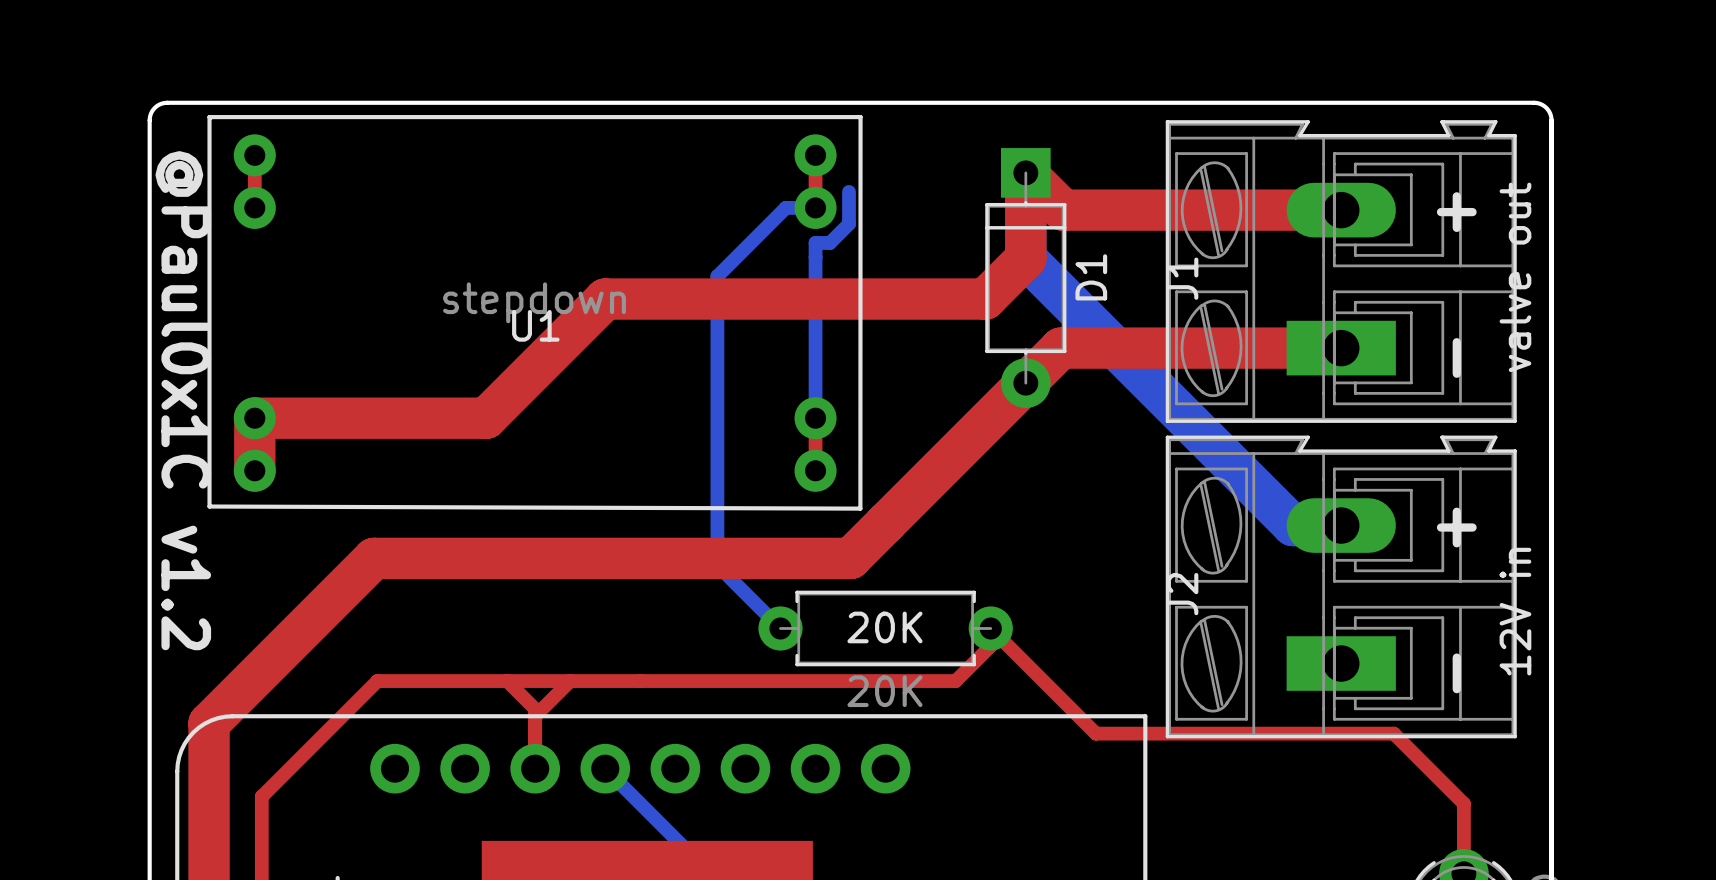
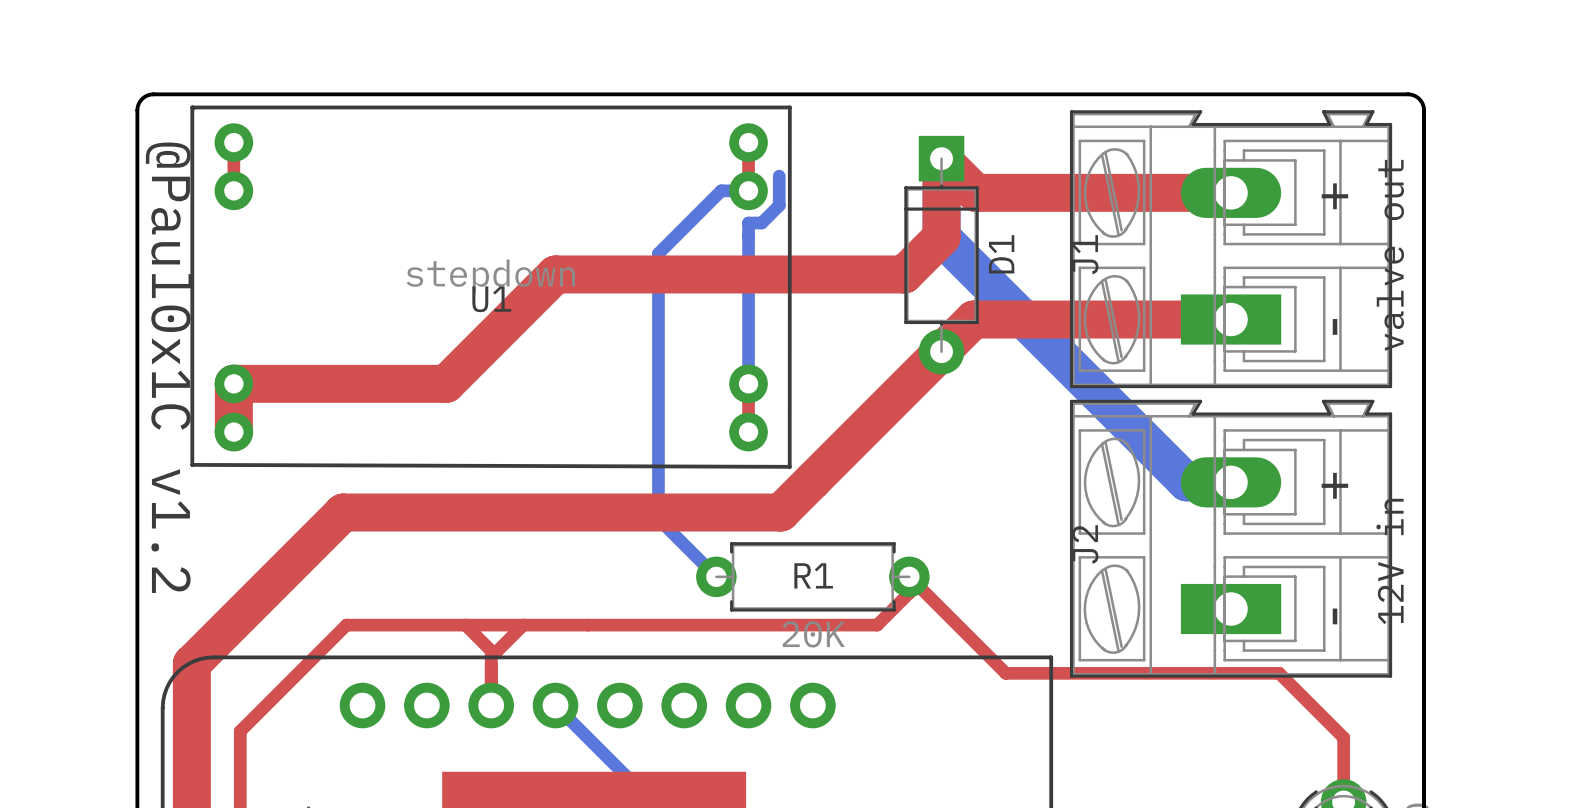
20K name: 20K (884, 627) -> R1 (813, 575)

